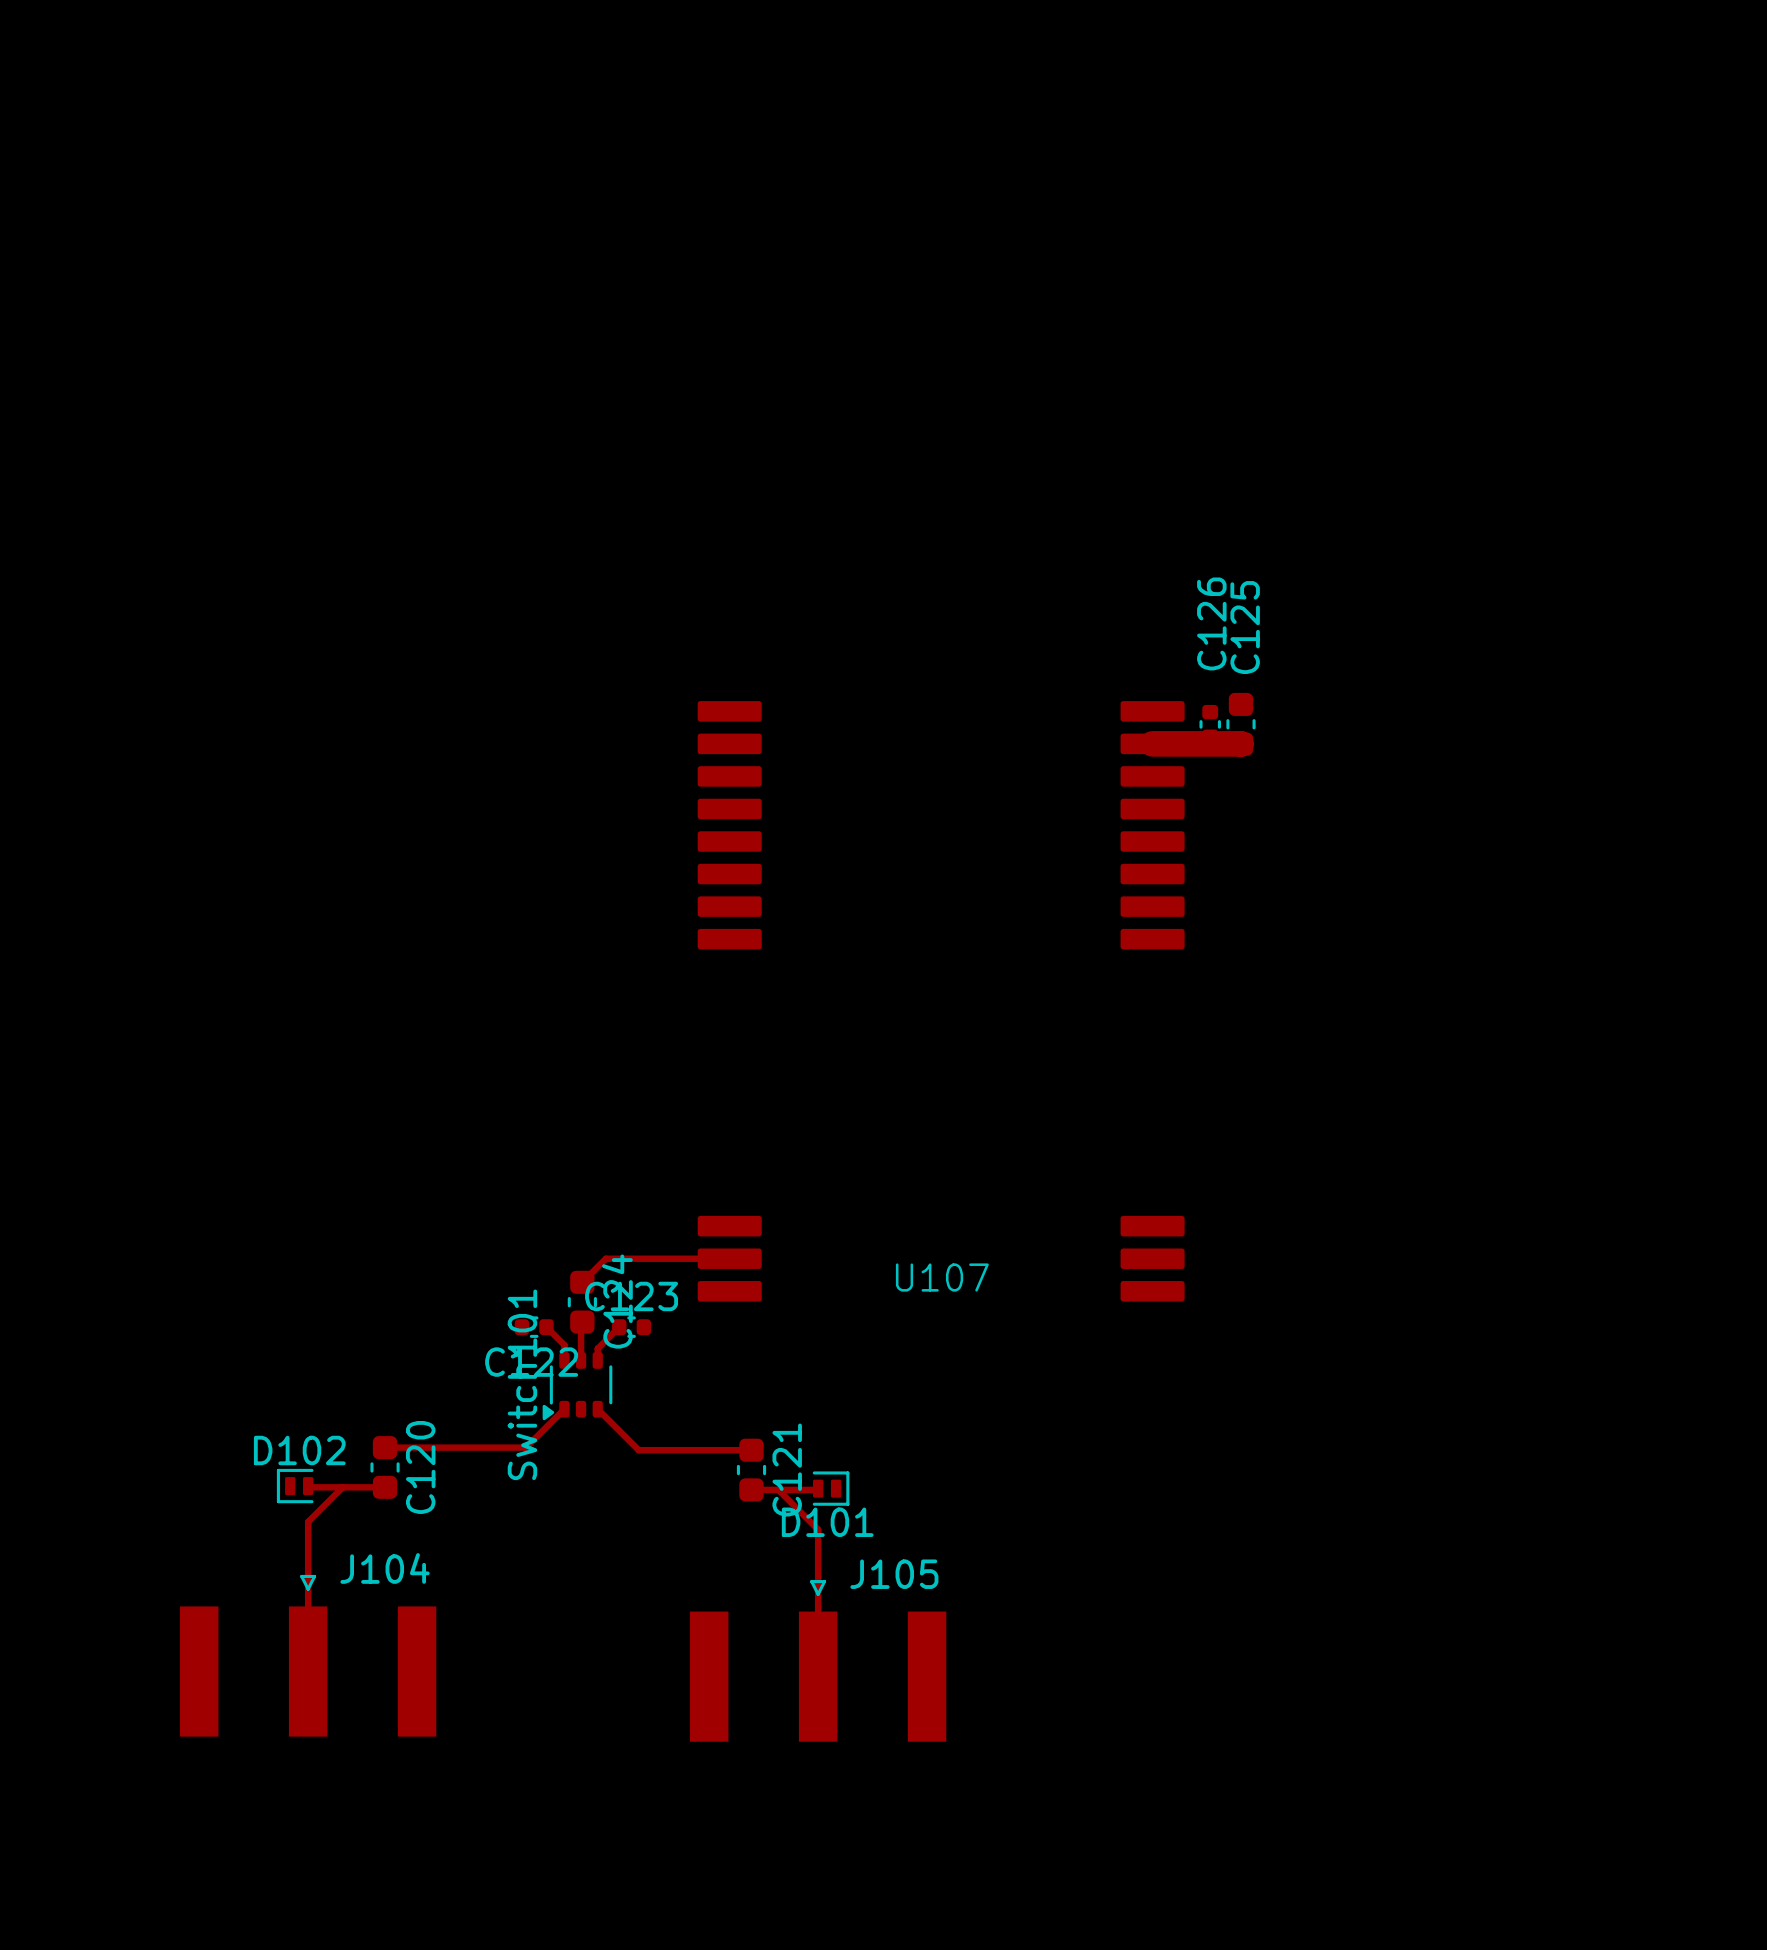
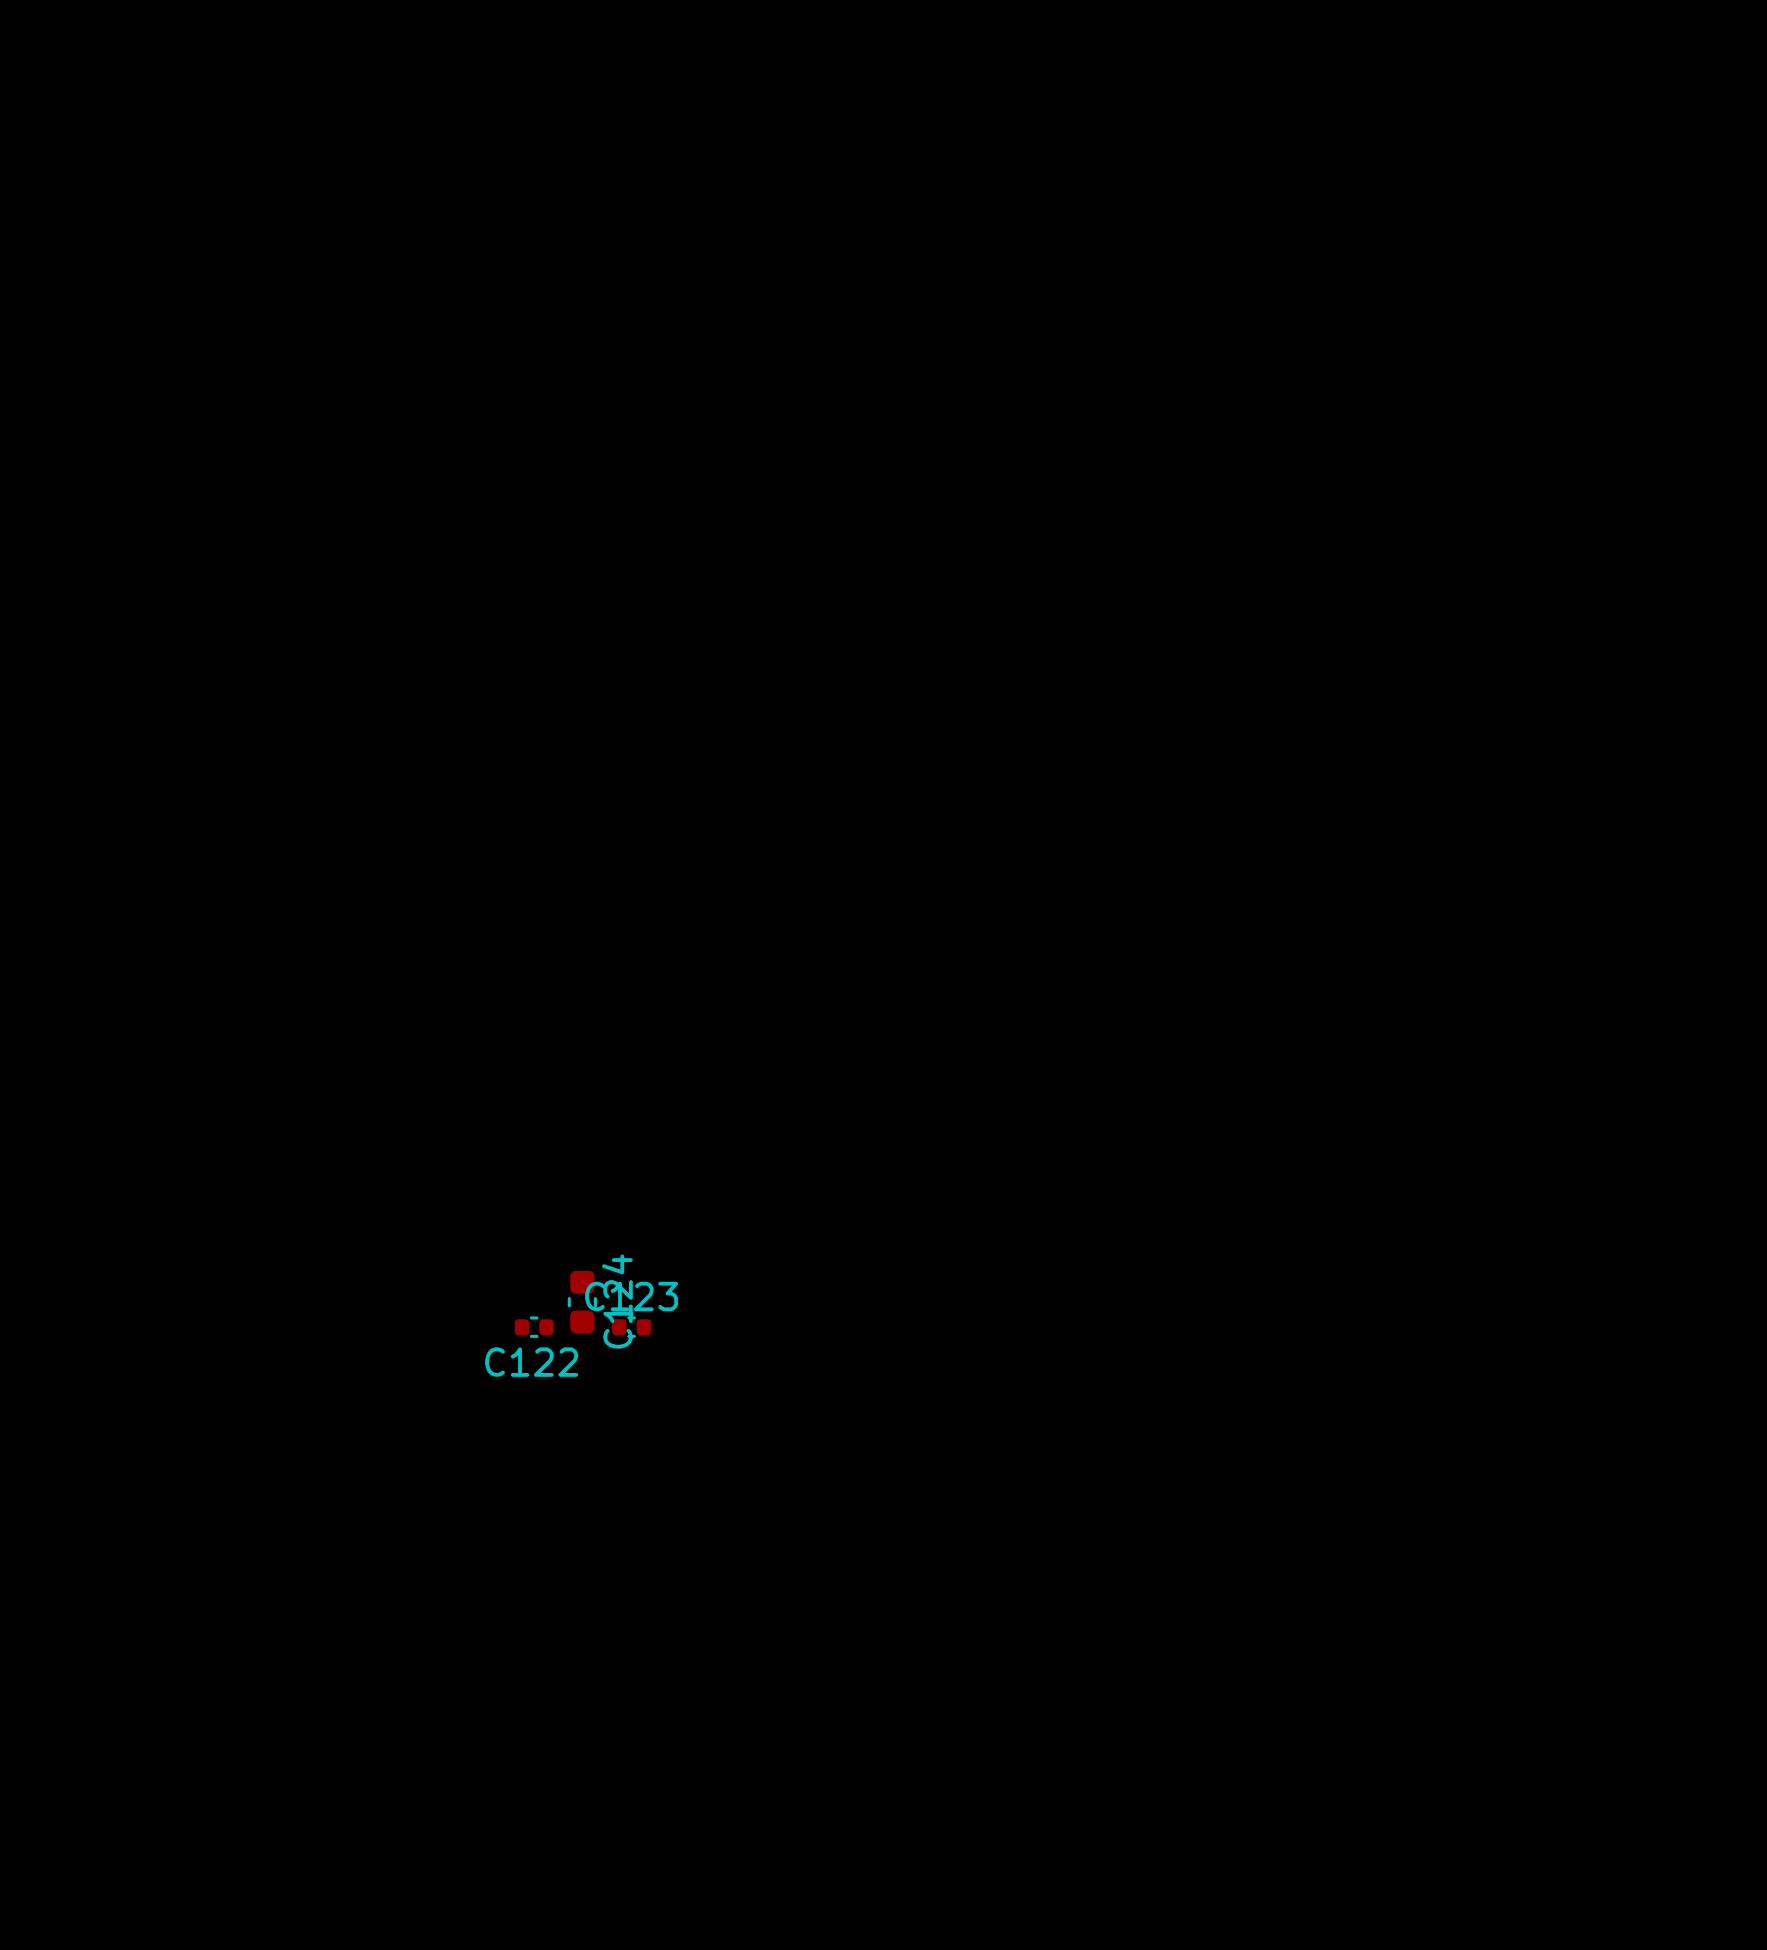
C126: (1210, 724) -> none
C125: (1240, 724) -> none
track: (1152, 743) (1240, 743) -> none
U107: (941, 1001) -> none
track: (729, 1258) (605, 1258) (582, 1282) -> none
track: (582, 1322) (581, 1360) -> none
track: (546, 1327) (564, 1345) (564, 1360) -> none
track: (619, 1327) (597, 1348) (597, 1360) -> none
Switch101: (577, 1386) -> none
track: (564, 1409) (525, 1447) (385, 1447) -> none
track: (597, 1409) (638, 1450) (751, 1450) -> none
C120: (385, 1467) -> none
C121: (751, 1470) -> none
D102: (295, 1486) -> none
track: (308, 1486) (385, 1487) -> none
track: (342, 1487) (308, 1521) (308, 1671) -> none
track: (818, 1488) (751, 1489) -> none
D101: (831, 1488) -> none
track: (778, 1489) (818, 1529) (818, 1676) -> none
J104: (308, 1655) -> none
J105: (818, 1660) -> none

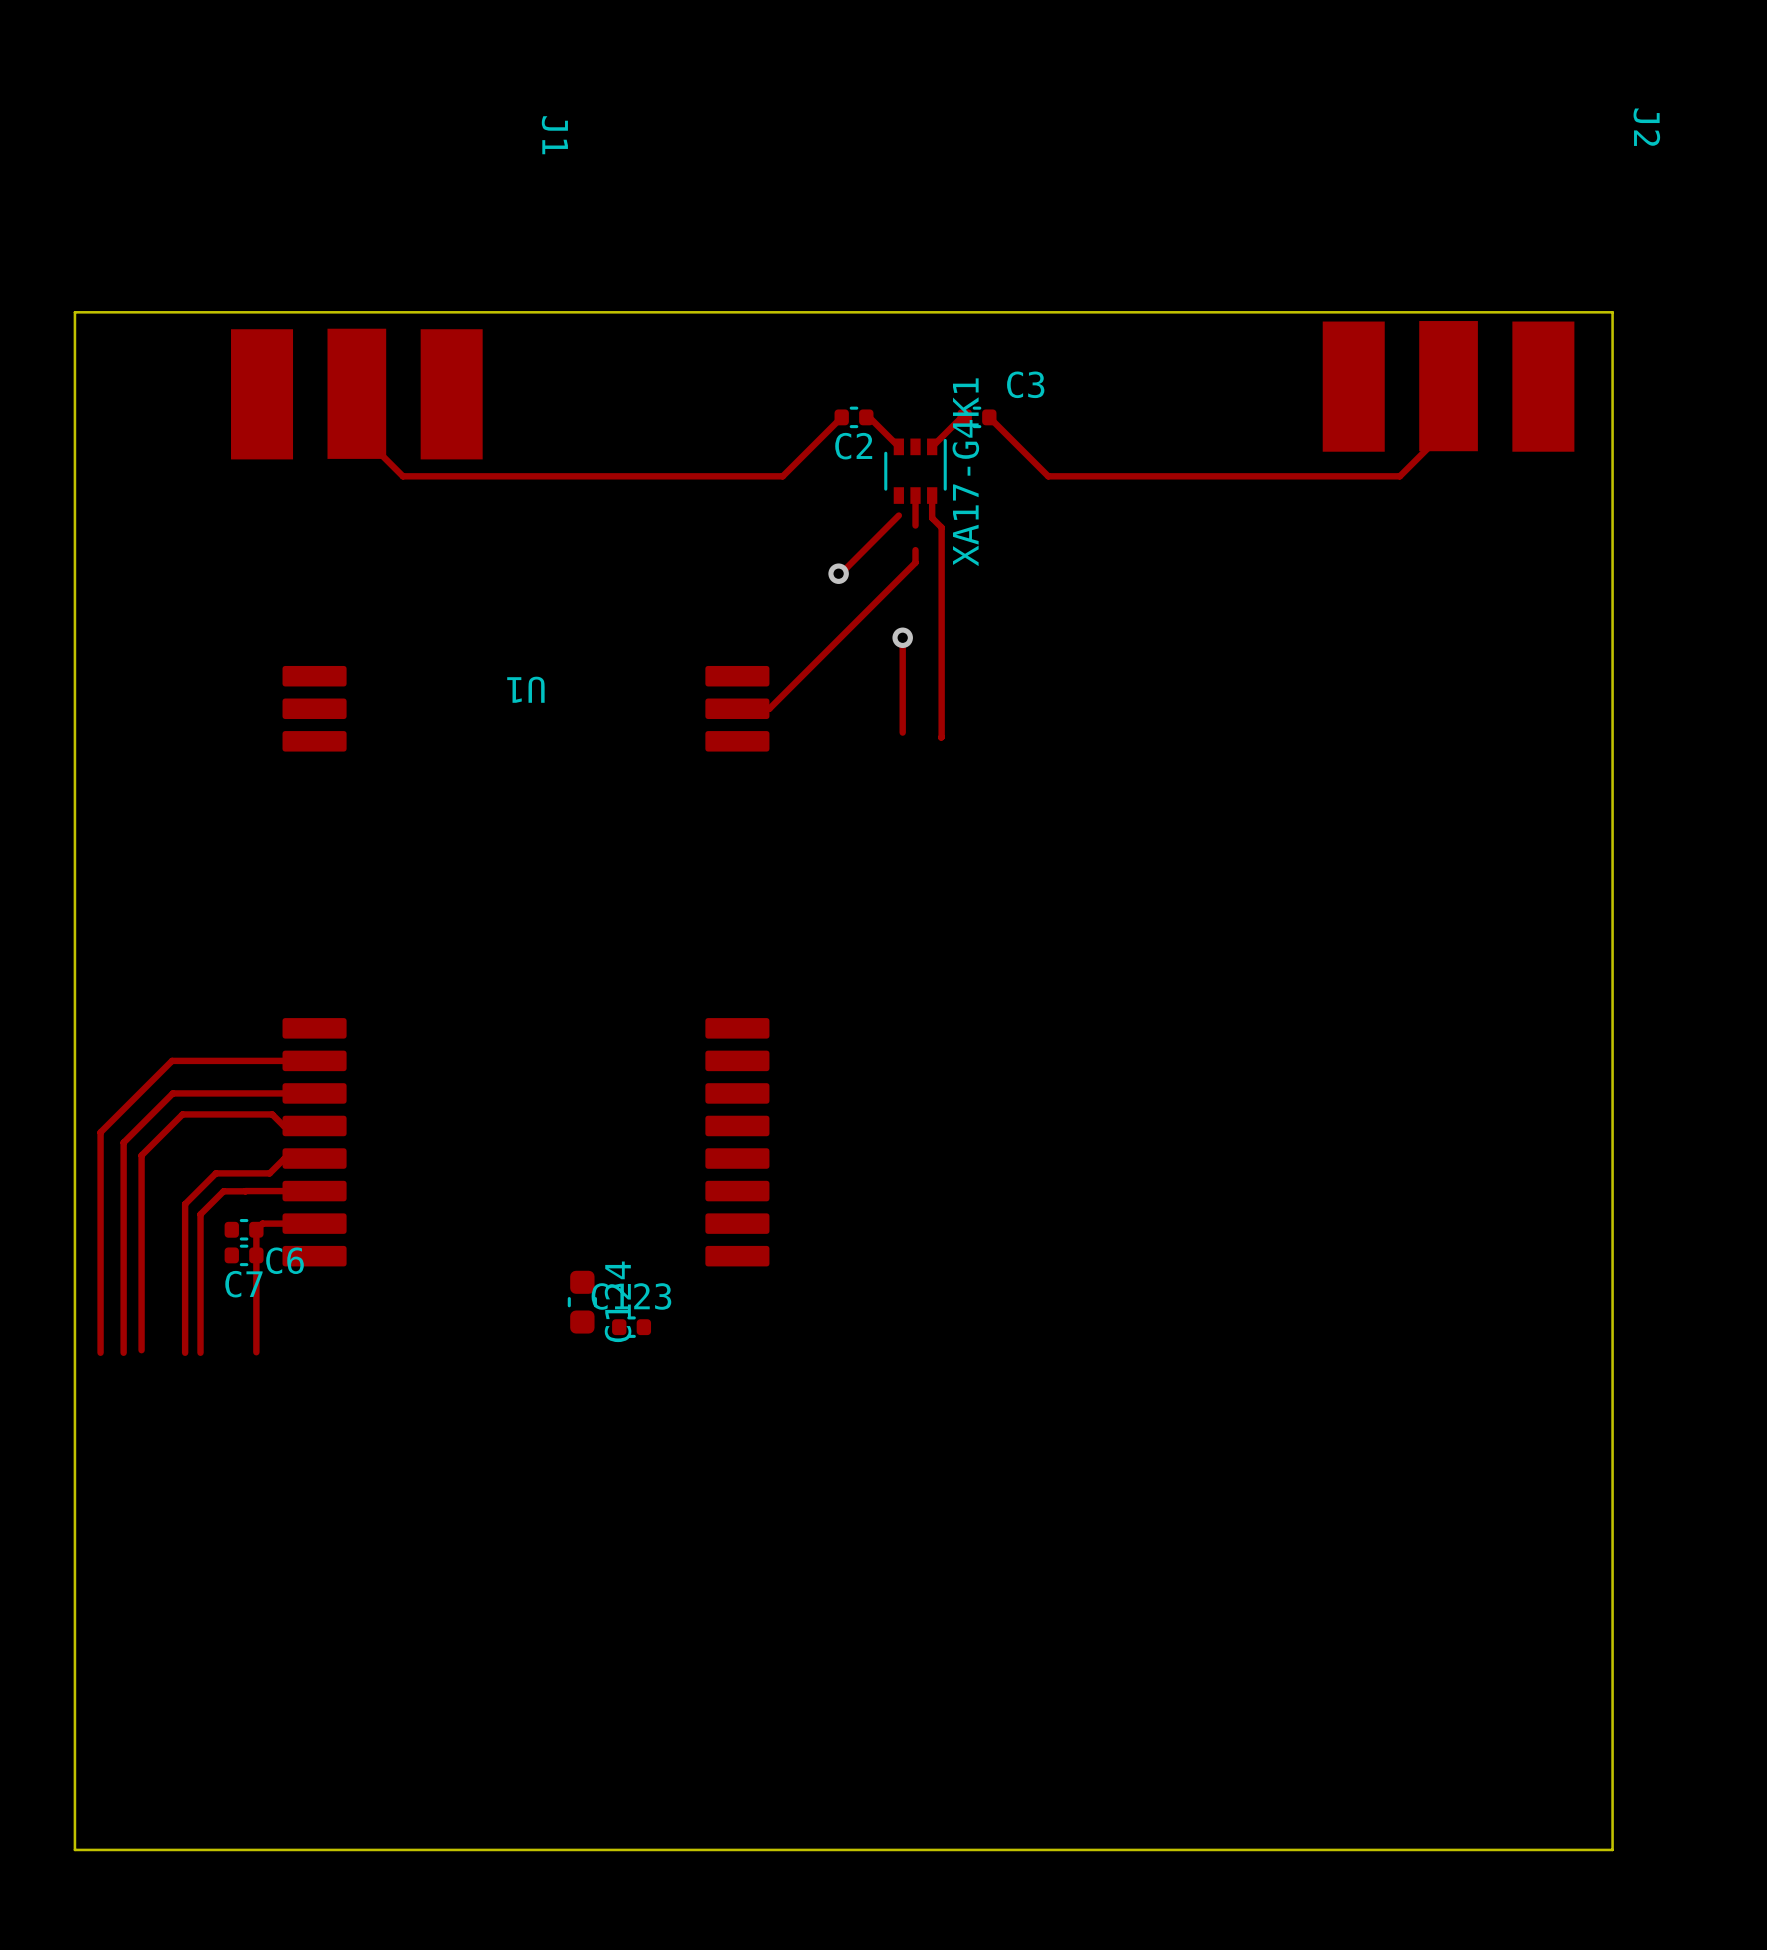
board edge: none -> (74, 312) (1612, 312) (1612, 1849) (74, 1849) (74, 312)
track: none -> (1448, 386) (1448, 427) (1399, 476) (1048, 476) (989, 417)
J2: none -> (1448, 386)
track: none -> (356, 393) (356, 430) (402, 476) (782, 476) (841, 417)
J1: none -> (356, 394)
C2: none -> (854, 417)
track: none -> (866, 417) (869, 417) (898, 446)
track: none -> (964, 417) (961, 417) (932, 446)
C3: none -> (977, 417)
XA17-G4K1: none -> (915, 471)
track: none -> (915, 495) (915, 525)
track: none -> (932, 495) (932, 518) (941, 527) (941, 737)
track: none -> (898, 515) (840, 573)
track: none -> (915, 550) (915, 562) (769, 708) (737, 708)
via: none -> (838, 573)
track: none -> (902, 637) (902, 732)
via: none -> (902, 637)
U1: none -> (525, 966)
track: none -> (314, 1060) (172, 1060) (100, 1132) (100, 1352)
track: none -> (314, 1093) (172, 1093) (123, 1142) (123, 1352)
track: none -> (314, 1125) (283, 1125) (272, 1114) (182, 1114) (141, 1155) (141, 1350)
track: none -> (314, 1158) (284, 1158) (269, 1173) (215, 1173) (185, 1204) (185, 1352)
track: none -> (245, 1191) (314, 1191)
track: none -> (245, 1191) (223, 1191) (200, 1214) (200, 1352)
track: none -> (314, 1223) (262, 1223) (256, 1229) (256, 1352)
C6: none -> (244, 1229)
C7: none -> (244, 1255)
C122: (534, 1327) -> none

